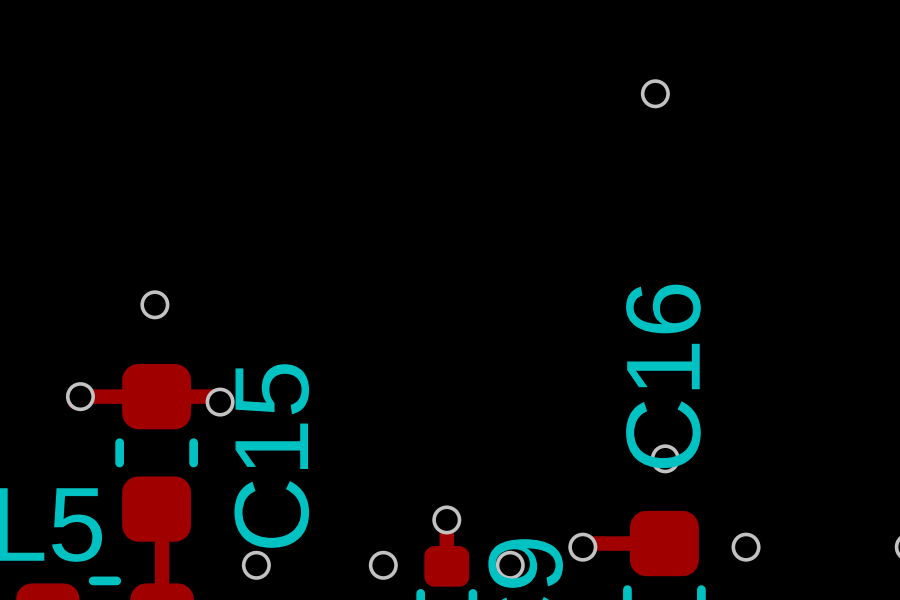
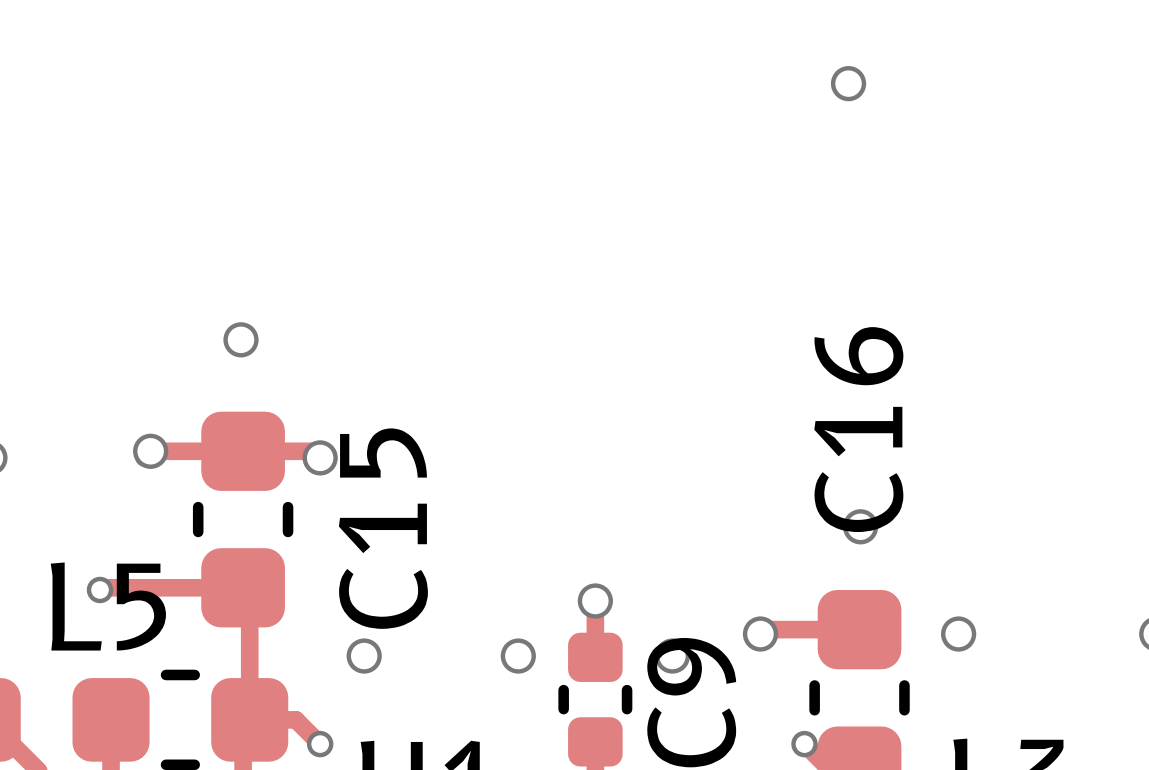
track: none -> (243, 587) (102, 587) (100, 589)
via: none -> (100, 589)

